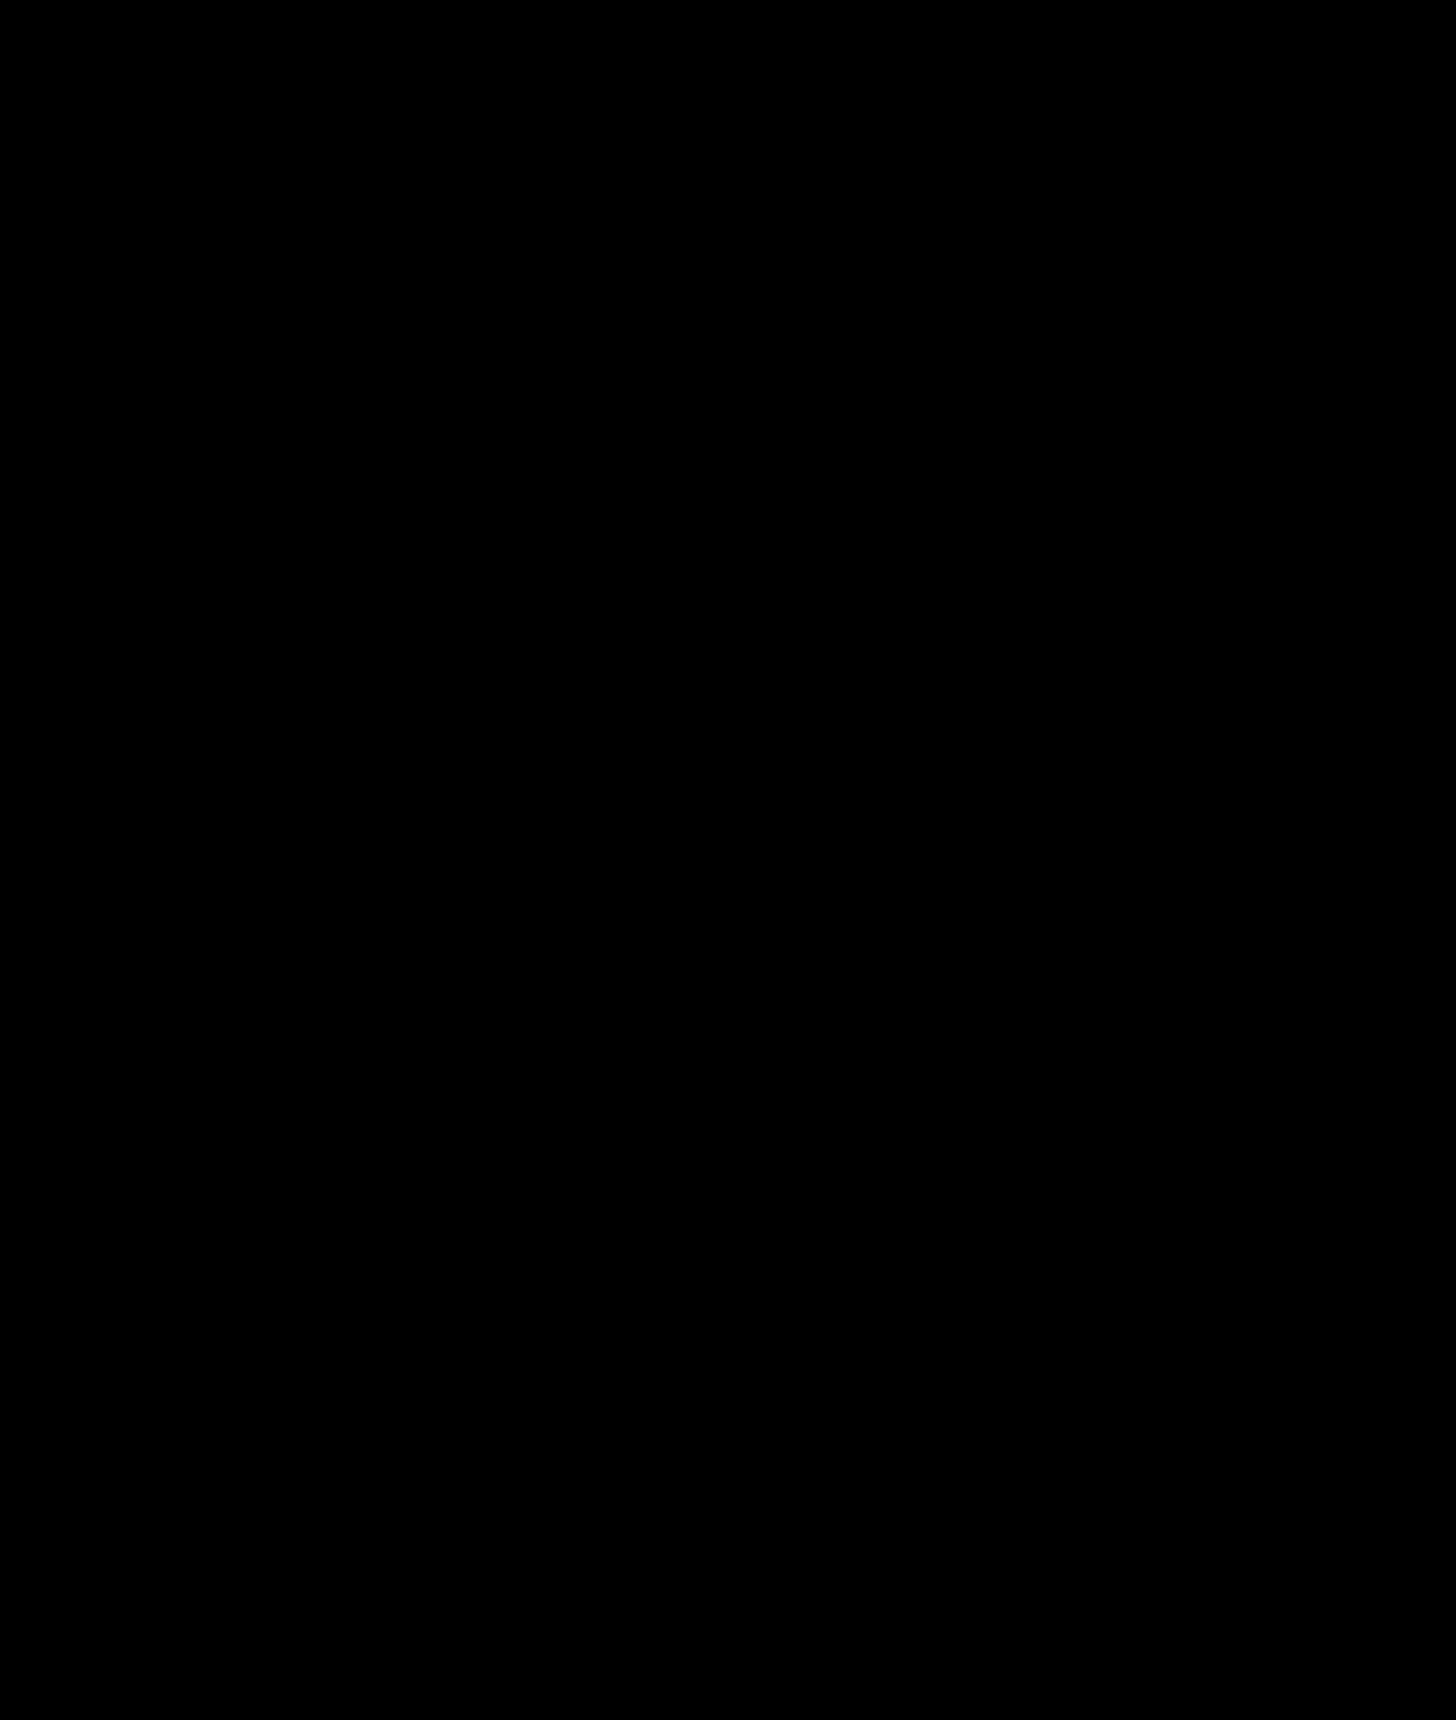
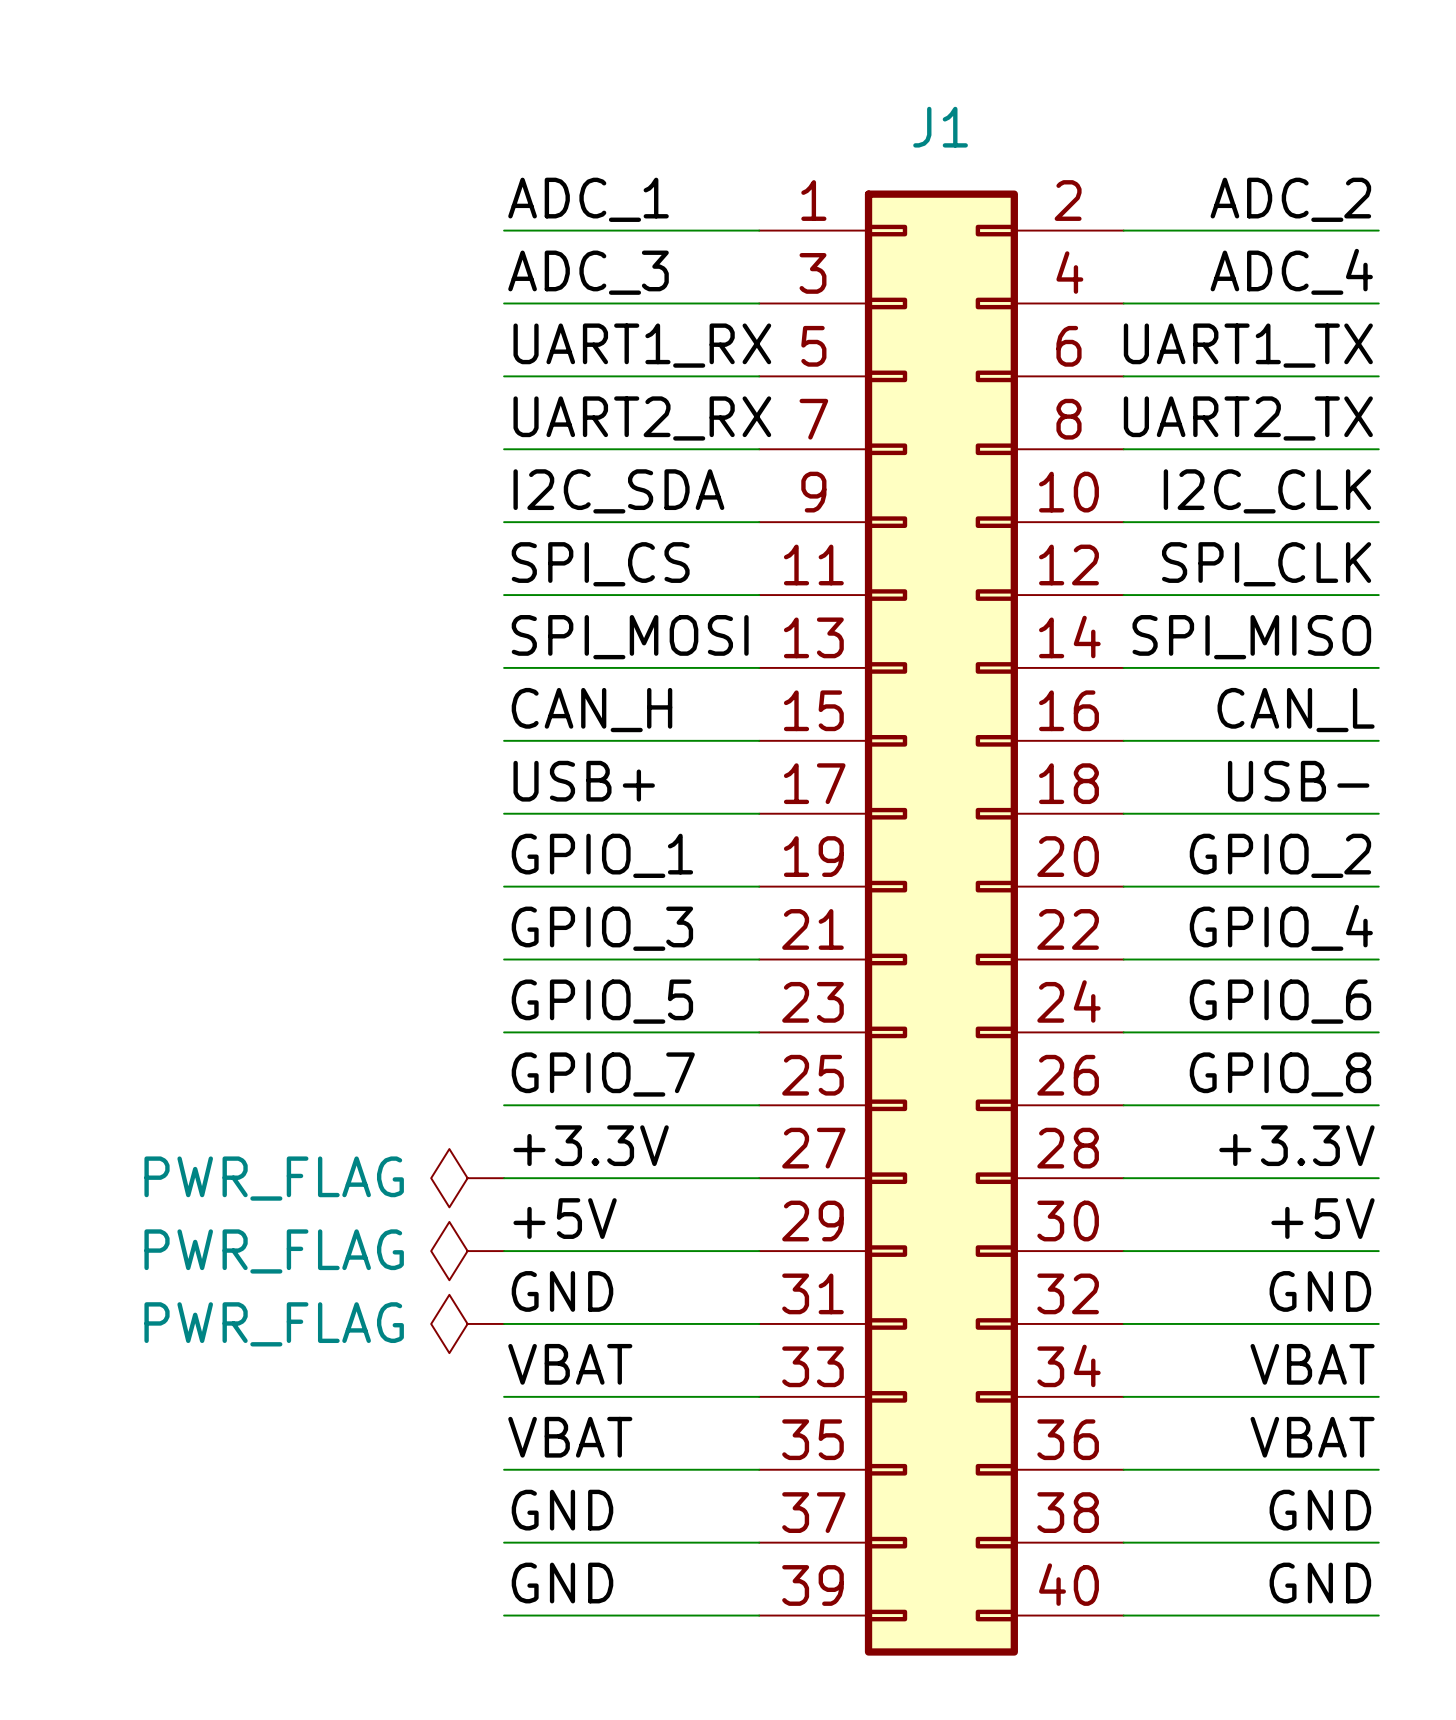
label: none -> ADC_1 (588, 199)
label: none -> ADC_2 (1290, 199)
wire: none -> (504, 230) (759, 230)
wire: none -> (1123, 230) (1378, 230)
label: none -> ADC_3 (588, 272)
label: none -> ADC_4 (1291, 271)
wire: none -> (504, 303) (759, 303)
wire: none -> (1123, 303) (1378, 303)
label: none -> UART1_RX (642, 345)
label: none -> UART1_TX (1248, 345)
wire: none -> (504, 376) (759, 376)
wire: none -> (1123, 376) (1378, 376)
label: none -> UART2_RX (642, 418)
label: none -> UART2_TX (1248, 418)
wire: none -> (504, 449) (759, 449)
wire: none -> (1123, 449) (1378, 449)
label: none -> I2C_SDA (618, 491)
label: none -> I2C_CLK (1267, 491)
wire: none -> (504, 522) (759, 522)
wire: none -> (1123, 522) (1378, 522)
label: none -> SPI_CS (600, 564)
label: none -> SPI_CLK (1266, 564)
wire: none -> (504, 595) (759, 595)
wire: none -> (1123, 595) (1378, 595)
label: none -> SPI_MOSI (630, 637)
label: none -> SPI_MISO (1251, 637)
wire: none -> (504, 667) (759, 667)
wire: none -> (1123, 667) (1378, 667)
label: none -> CAN_H (591, 710)
label: none -> CAN_L (1296, 710)
wire: none -> (504, 740) (759, 740)
wire: none -> (1123, 740) (1378, 740)
label: none -> USB+ (584, 781)
label: none -> USB- (1298, 781)
wire: none -> (504, 813) (759, 813)
wire: none -> (1123, 813) (1378, 813)
label: none -> GPIO_1 (602, 855)
label: none -> GPIO_2 (1280, 855)
wire: none -> (504, 886) (759, 886)
wire: none -> (1123, 886) (1378, 886)
J1: none -> (941, 923)
label: none -> GPIO_3 (602, 928)
label: none -> GPIO_4 (1281, 927)
wire: none -> (504, 959) (759, 959)
wire: none -> (1123, 959) (1378, 959)
label: none -> GPIO_5 (602, 1001)
label: none -> GPIO_6 (1280, 1001)
wire: none -> (504, 1032) (759, 1032)
wire: none -> (1123, 1032) (1378, 1032)
label: none -> GPIO_7 (603, 1074)
label: none -> GPIO_8 (1280, 1074)
wire: none -> (504, 1105) (759, 1105)
wire: none -> (1123, 1105) (1378, 1105)
label: none -> +3.3V (591, 1145)
label: none -> +3.3V (1296, 1145)
power symbol: none -> PWR_FLAG (467, 1178)
wire: none -> (504, 1178) (759, 1178)
wire: none -> (1123, 1178) (1378, 1178)
label: none -> +5V (565, 1218)
label: none -> +5V (1322, 1218)
power symbol: none -> PWR_FLAG (467, 1251)
wire: none -> (504, 1251) (759, 1251)
wire: none -> (1123, 1251) (1378, 1251)
label: none -> GND (562, 1291)
label: none -> GND (1320, 1291)
power symbol: none -> PWR_FLAG (467, 1323)
wire: none -> (504, 1323) (759, 1323)
wire: none -> (1123, 1323) (1378, 1323)
label: none -> VBAT (570, 1364)
label: none -> VBAT (1312, 1364)
wire: none -> (504, 1396) (759, 1396)
wire: none -> (1123, 1396) (1378, 1396)
label: none -> VBAT (570, 1437)
label: none -> VBAT (1312, 1437)
wire: none -> (504, 1469) (759, 1469)
wire: none -> (1123, 1469) (1378, 1469)
label: none -> GND (562, 1510)
label: none -> GND (1320, 1510)
wire: none -> (504, 1542) (759, 1542)
wire: none -> (1123, 1542) (1378, 1542)
label: none -> GND (562, 1583)
label: none -> GND (1320, 1583)
wire: none -> (504, 1615) (759, 1615)
wire: none -> (1123, 1615) (1378, 1615)

